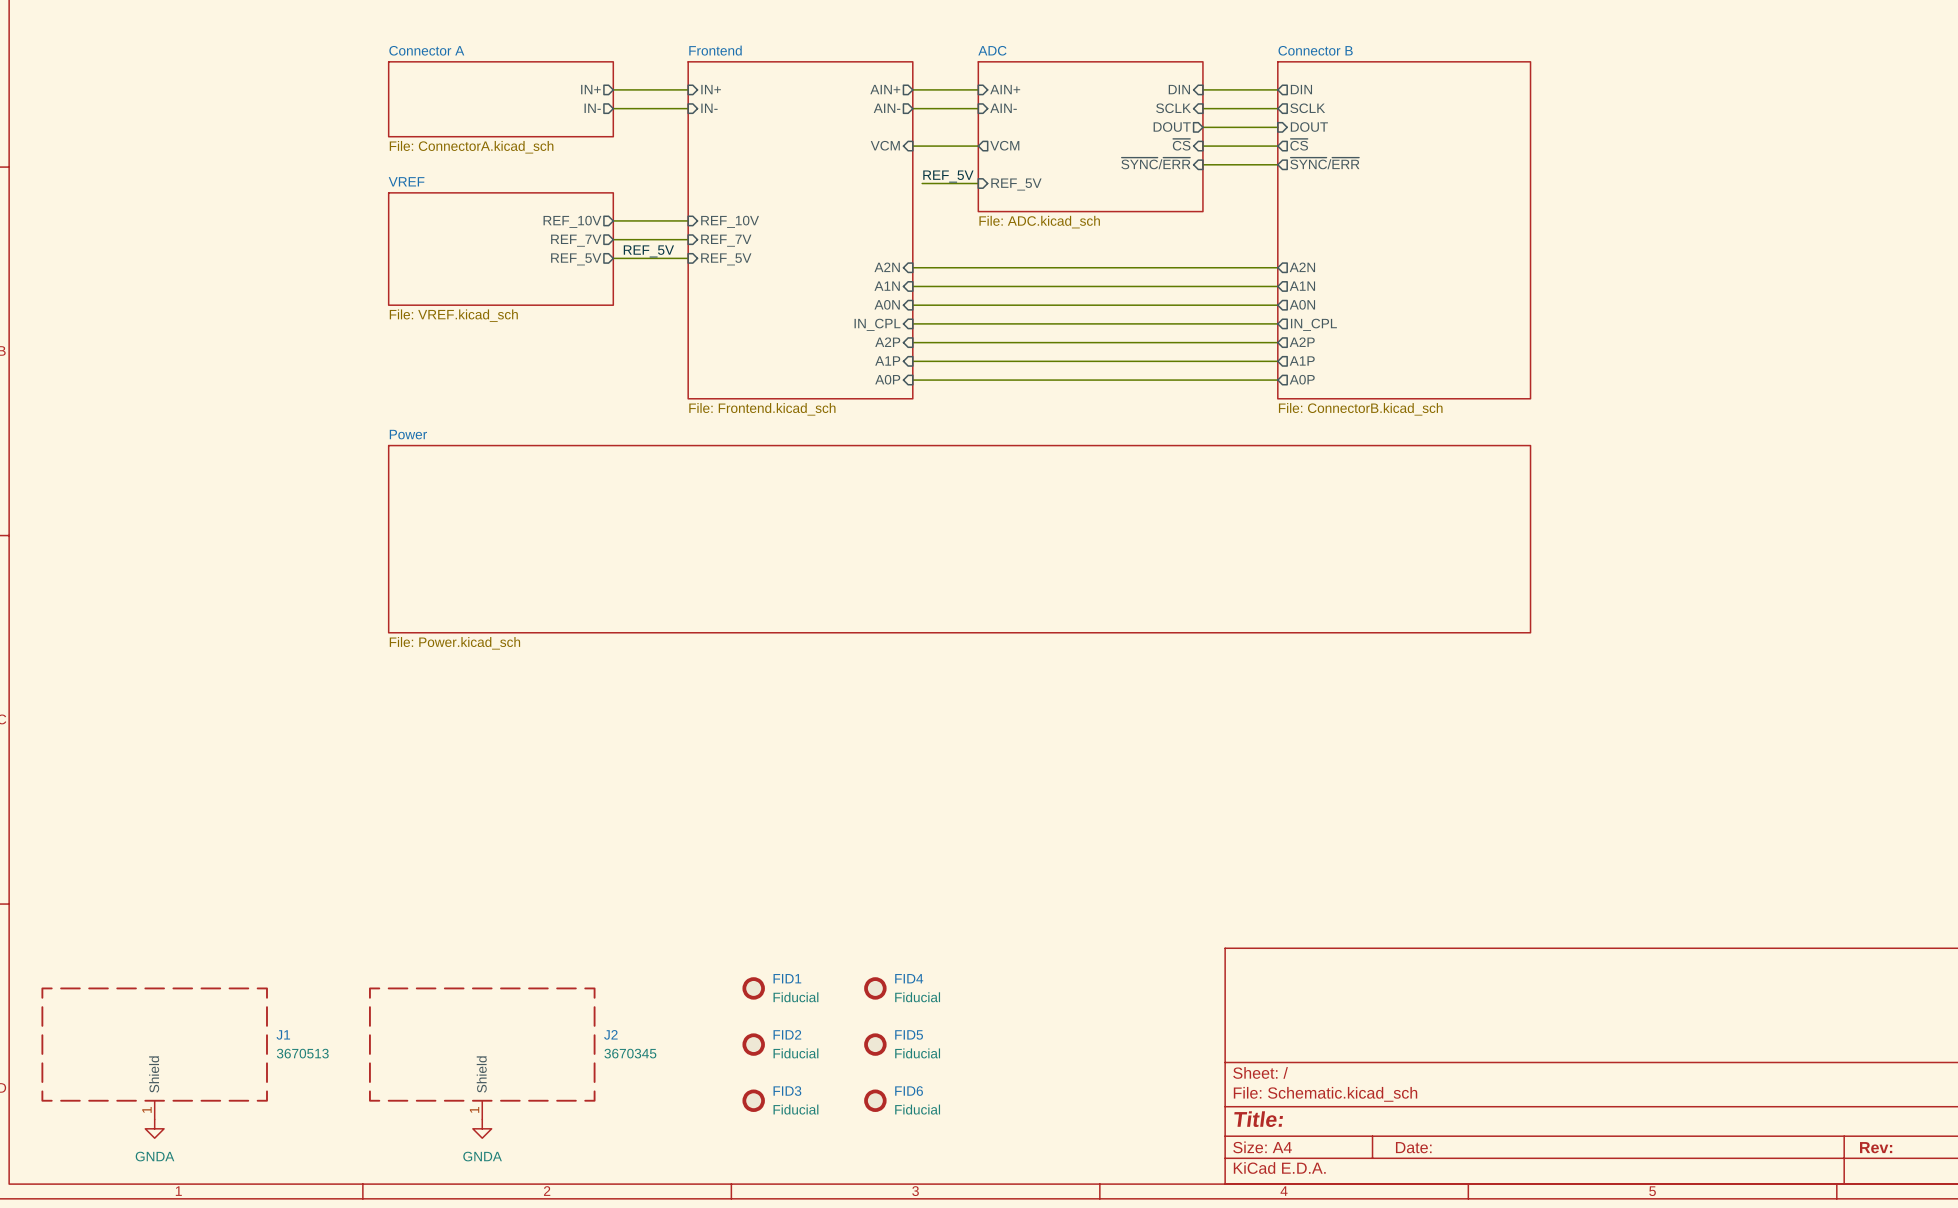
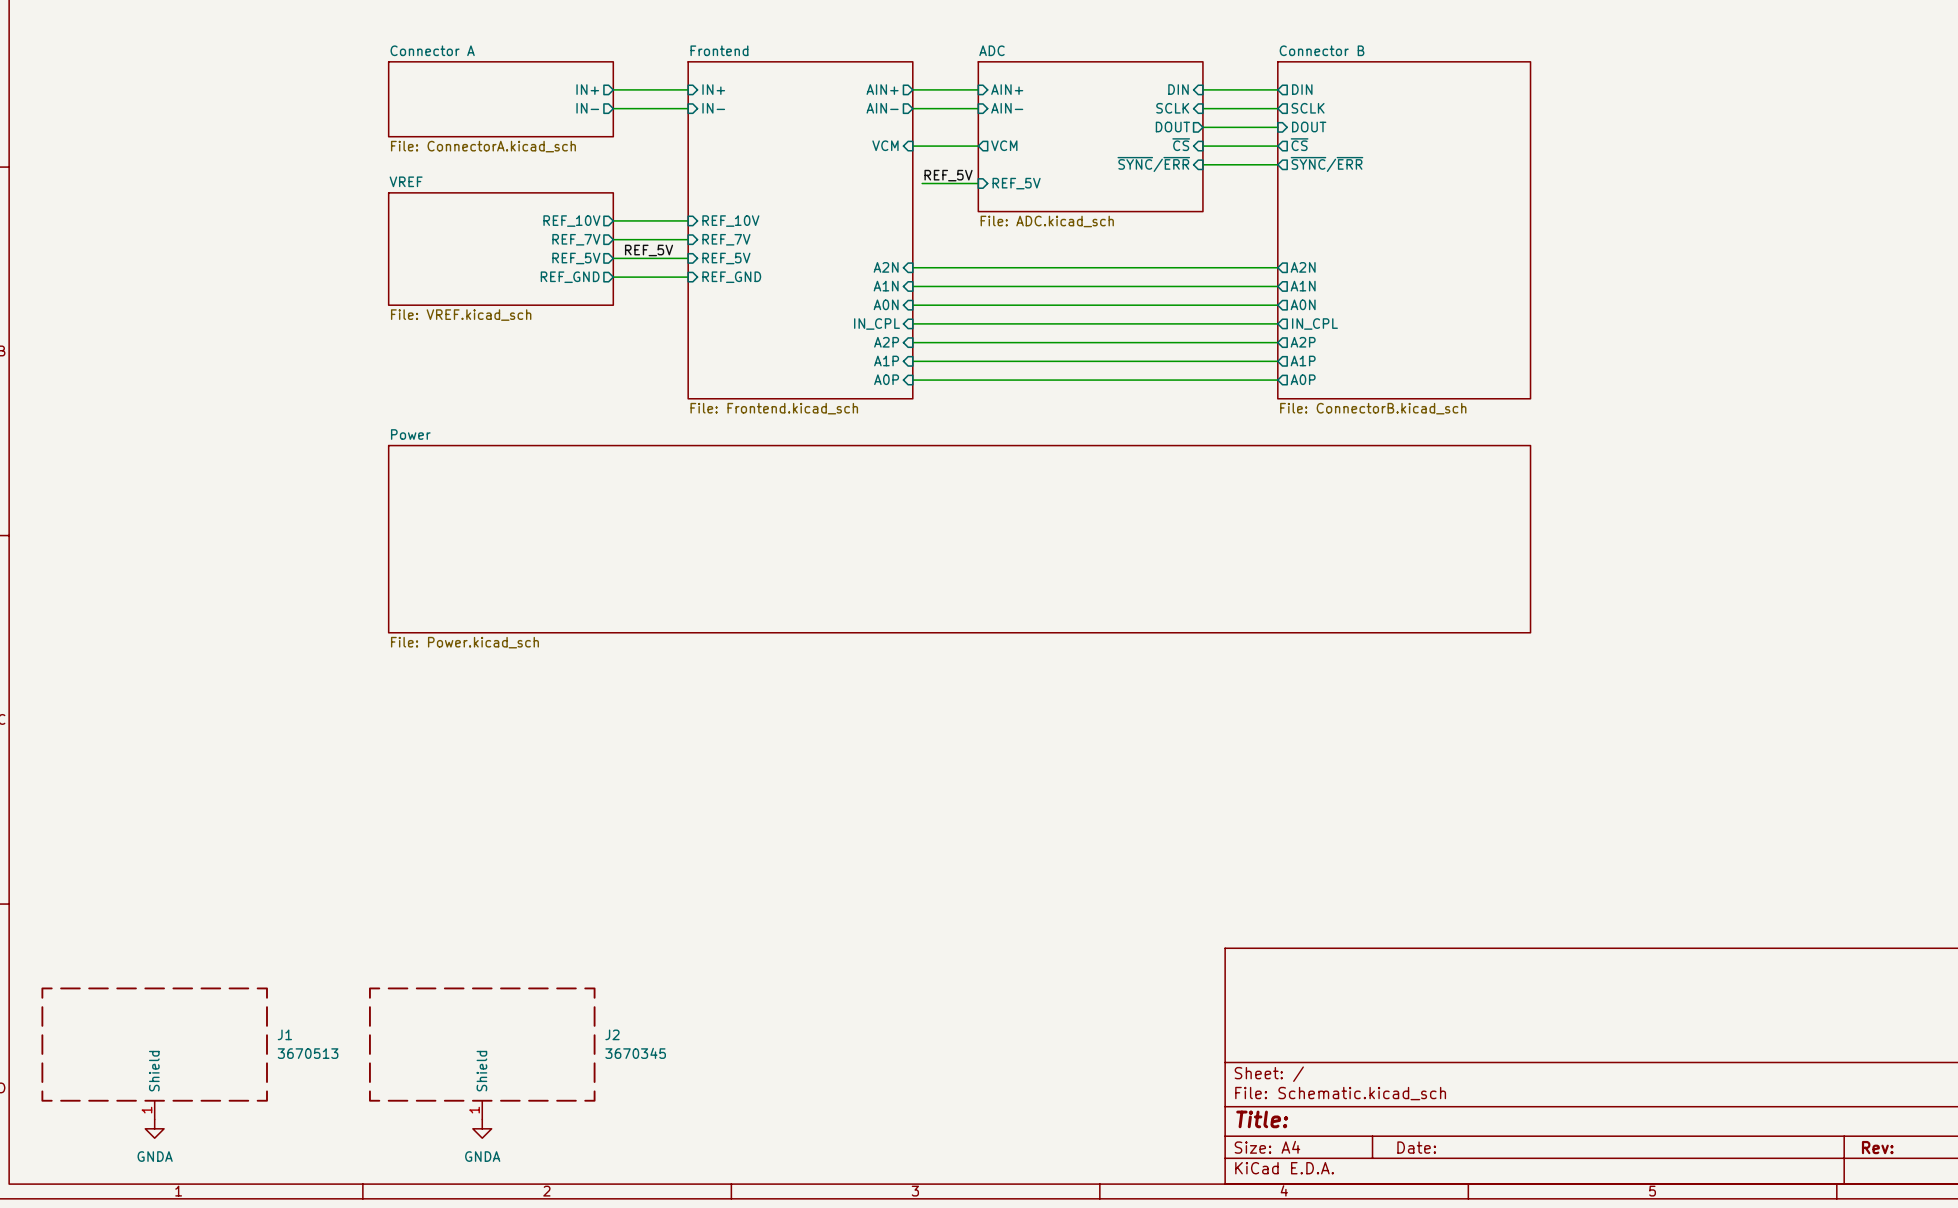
wire: none -> (613, 277) (688, 277)
sheet pin: none -> REF_GND (570, 277)
sheet pin: none -> REF_GND (731, 277)
FID1: Fiducial (753, 988) -> none
FID4: Fiducial (875, 988) -> none
FID2: Fiducial (753, 1044) -> none
FID5: Fiducial (875, 1044) -> none
FID3: Fiducial (753, 1100) -> none
FID6: Fiducial (875, 1100) -> none

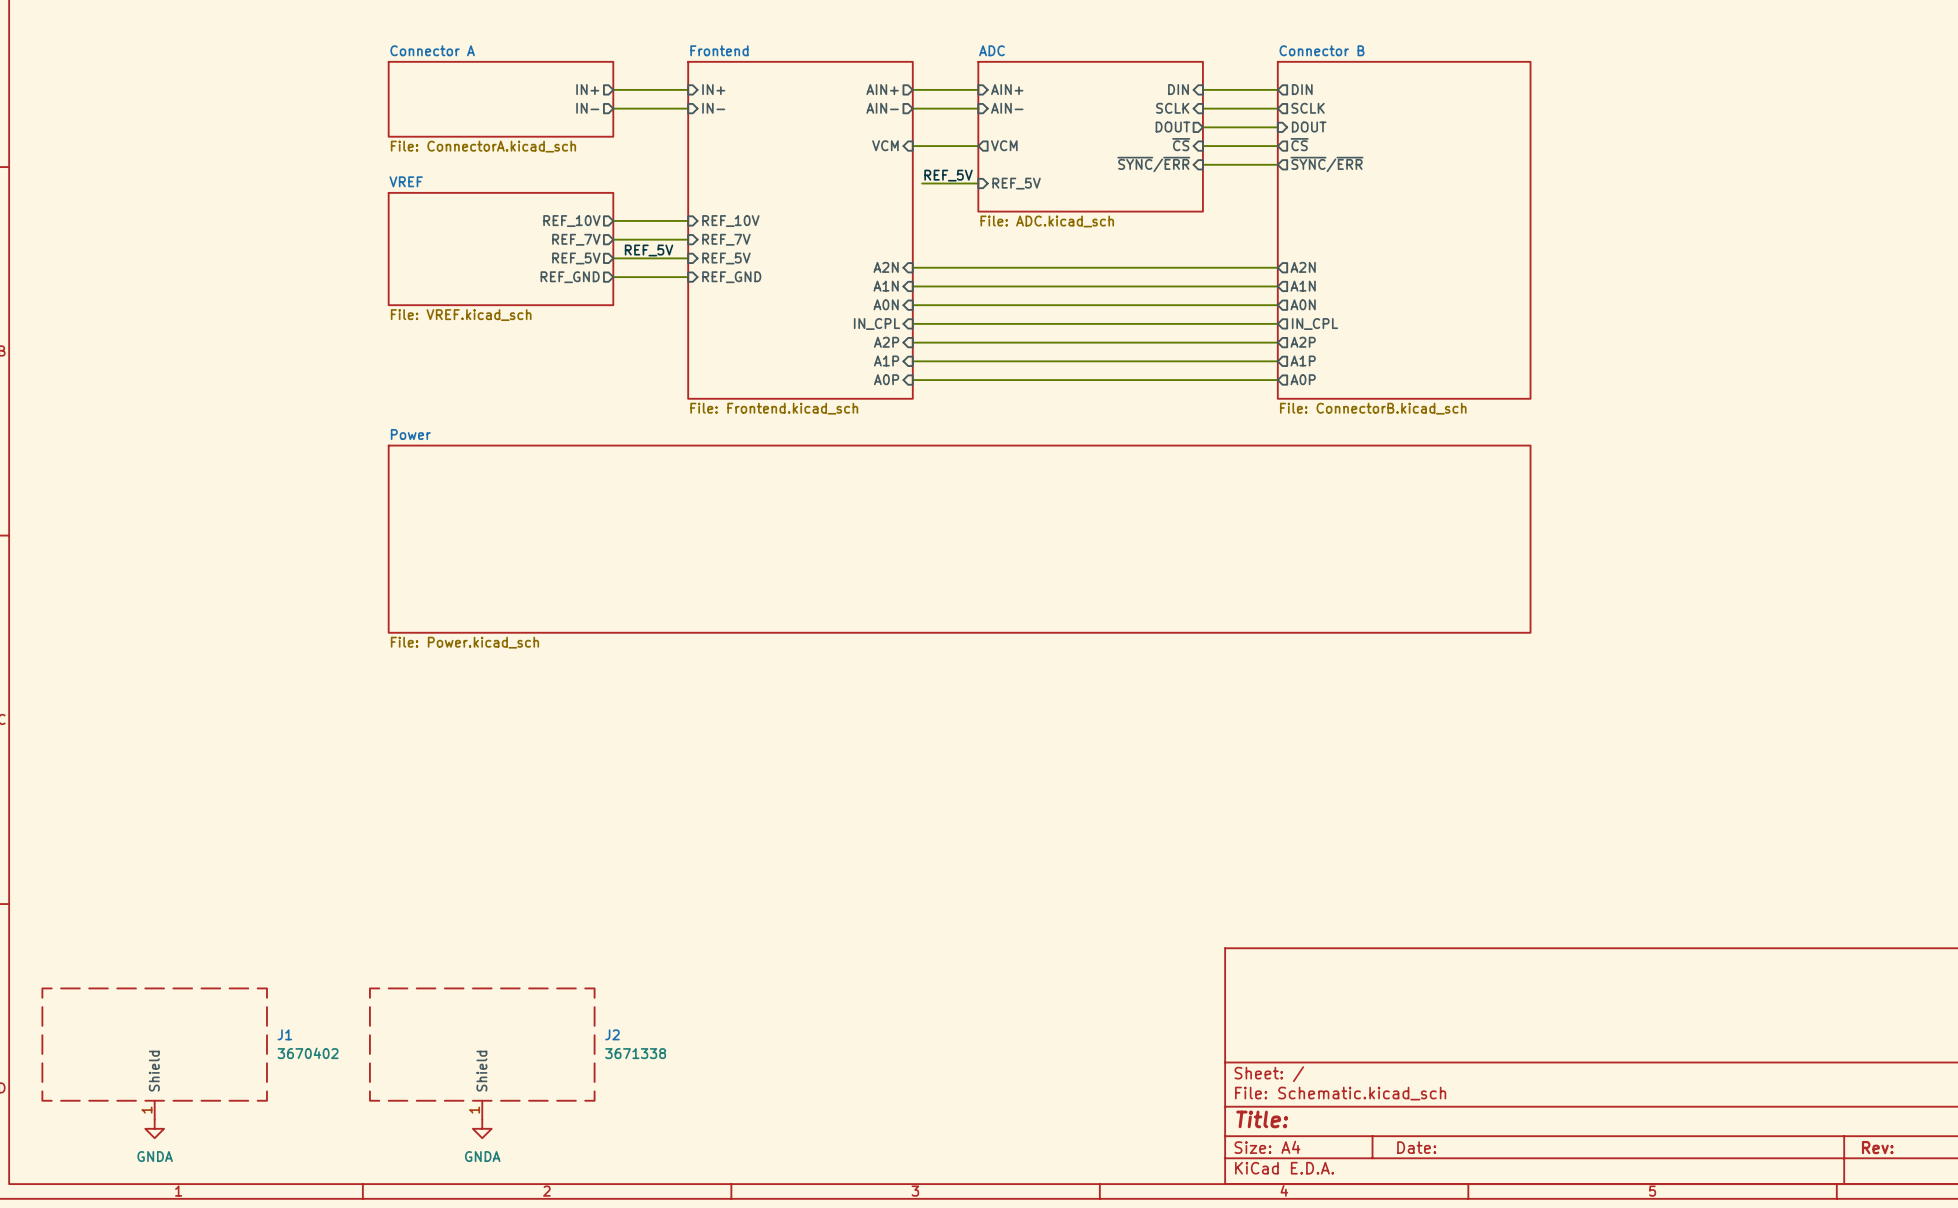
J1 value: 3670513 (308, 1053) -> 3670402 (308, 1053)
J2 value: 3670345 (635, 1053) -> 3671338 (635, 1053)

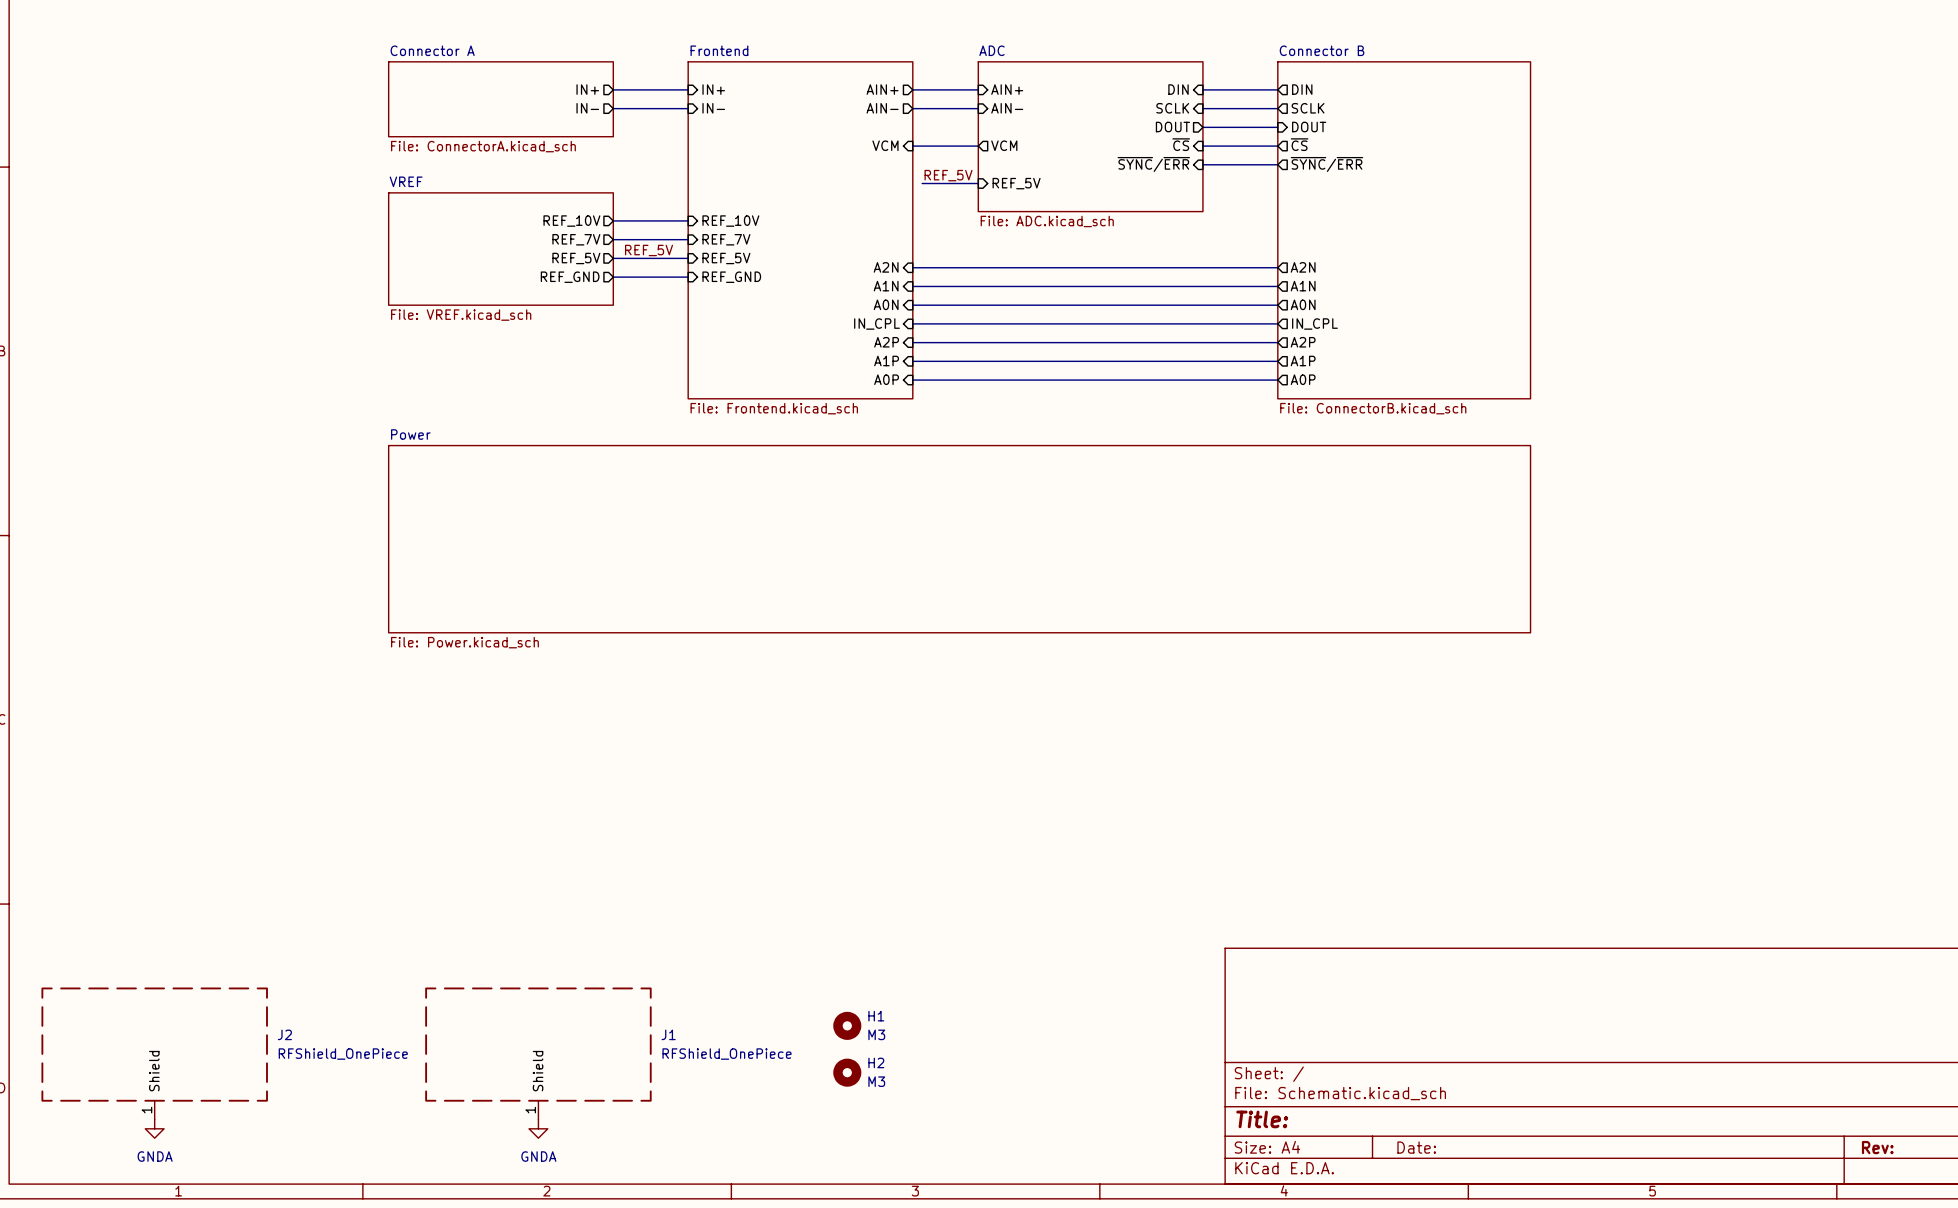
H1: none -> M3 (847, 1025)
J1 name: J1 (284, 1034) -> J2 (284, 1034)
J1 value: 3670402 (308, 1053) -> RFShield_OnePiece (343, 1054)
J2: 3671338 (482, 1053) -> none
J1: none -> RFShield_OnePiece (538, 1053)
H2: none -> M3 (847, 1072)
power symbol position: GNDA (482, 1128) -> GNDA (538, 1128)

